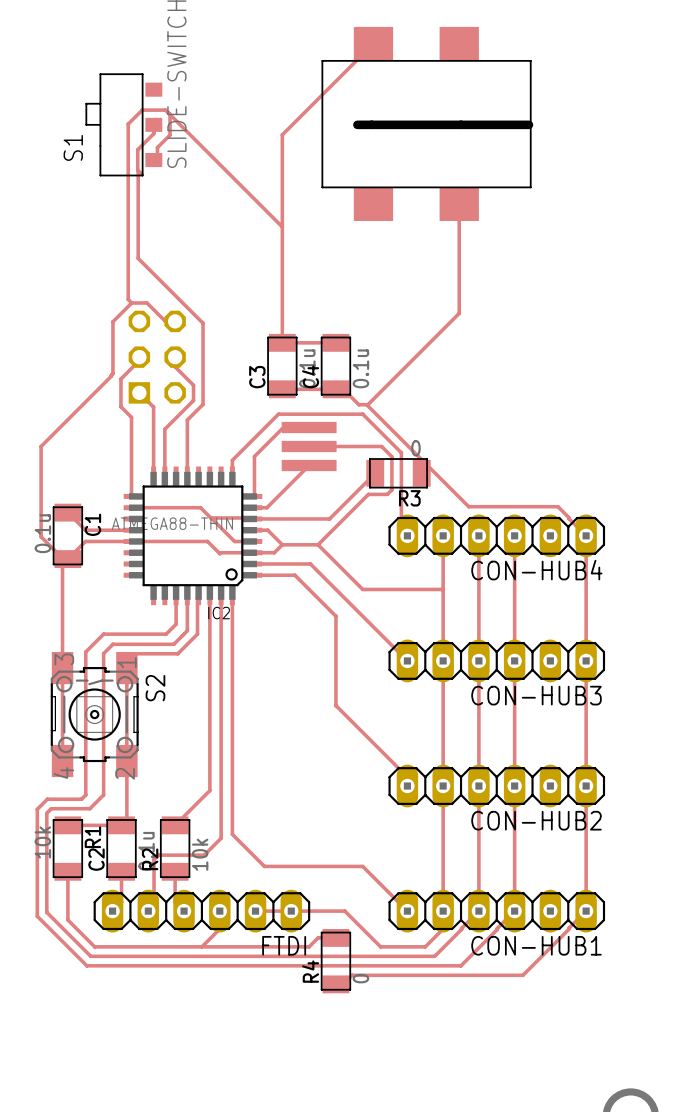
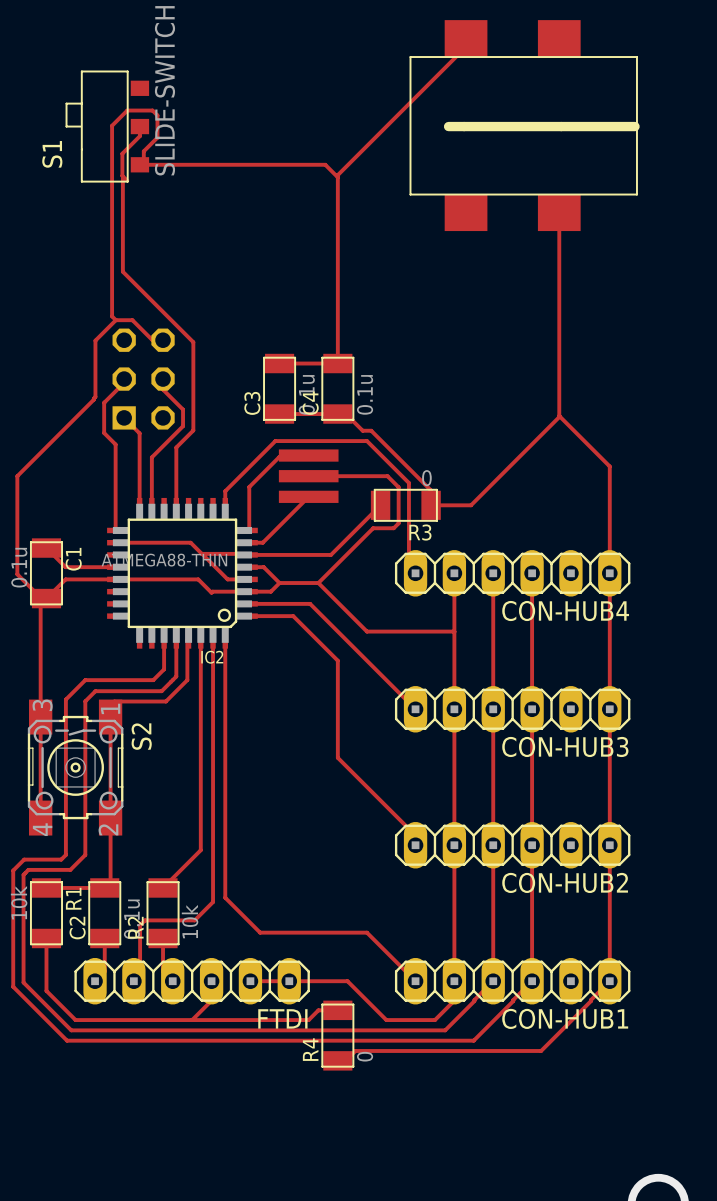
top track: (373, 43) (282, 134) (282, 342) -> none
top track: none -> (466, 38) (464, 40) (464, 48) (337, 175) (337, 363)
top track: (170, 114) (282, 226) -> none
part position: (427, 123) -> (524, 125)
top track: none -> (143, 164) (325, 164) (337, 177)
top track: (459, 204) (459, 313) (367, 405) -> none
top track: none -> (559, 416) (471, 505) (431, 505)
top track: (421, 459) (468, 506) (558, 506) (586, 535) -> (559, 212) (559, 415) (609, 466) (609, 573)

